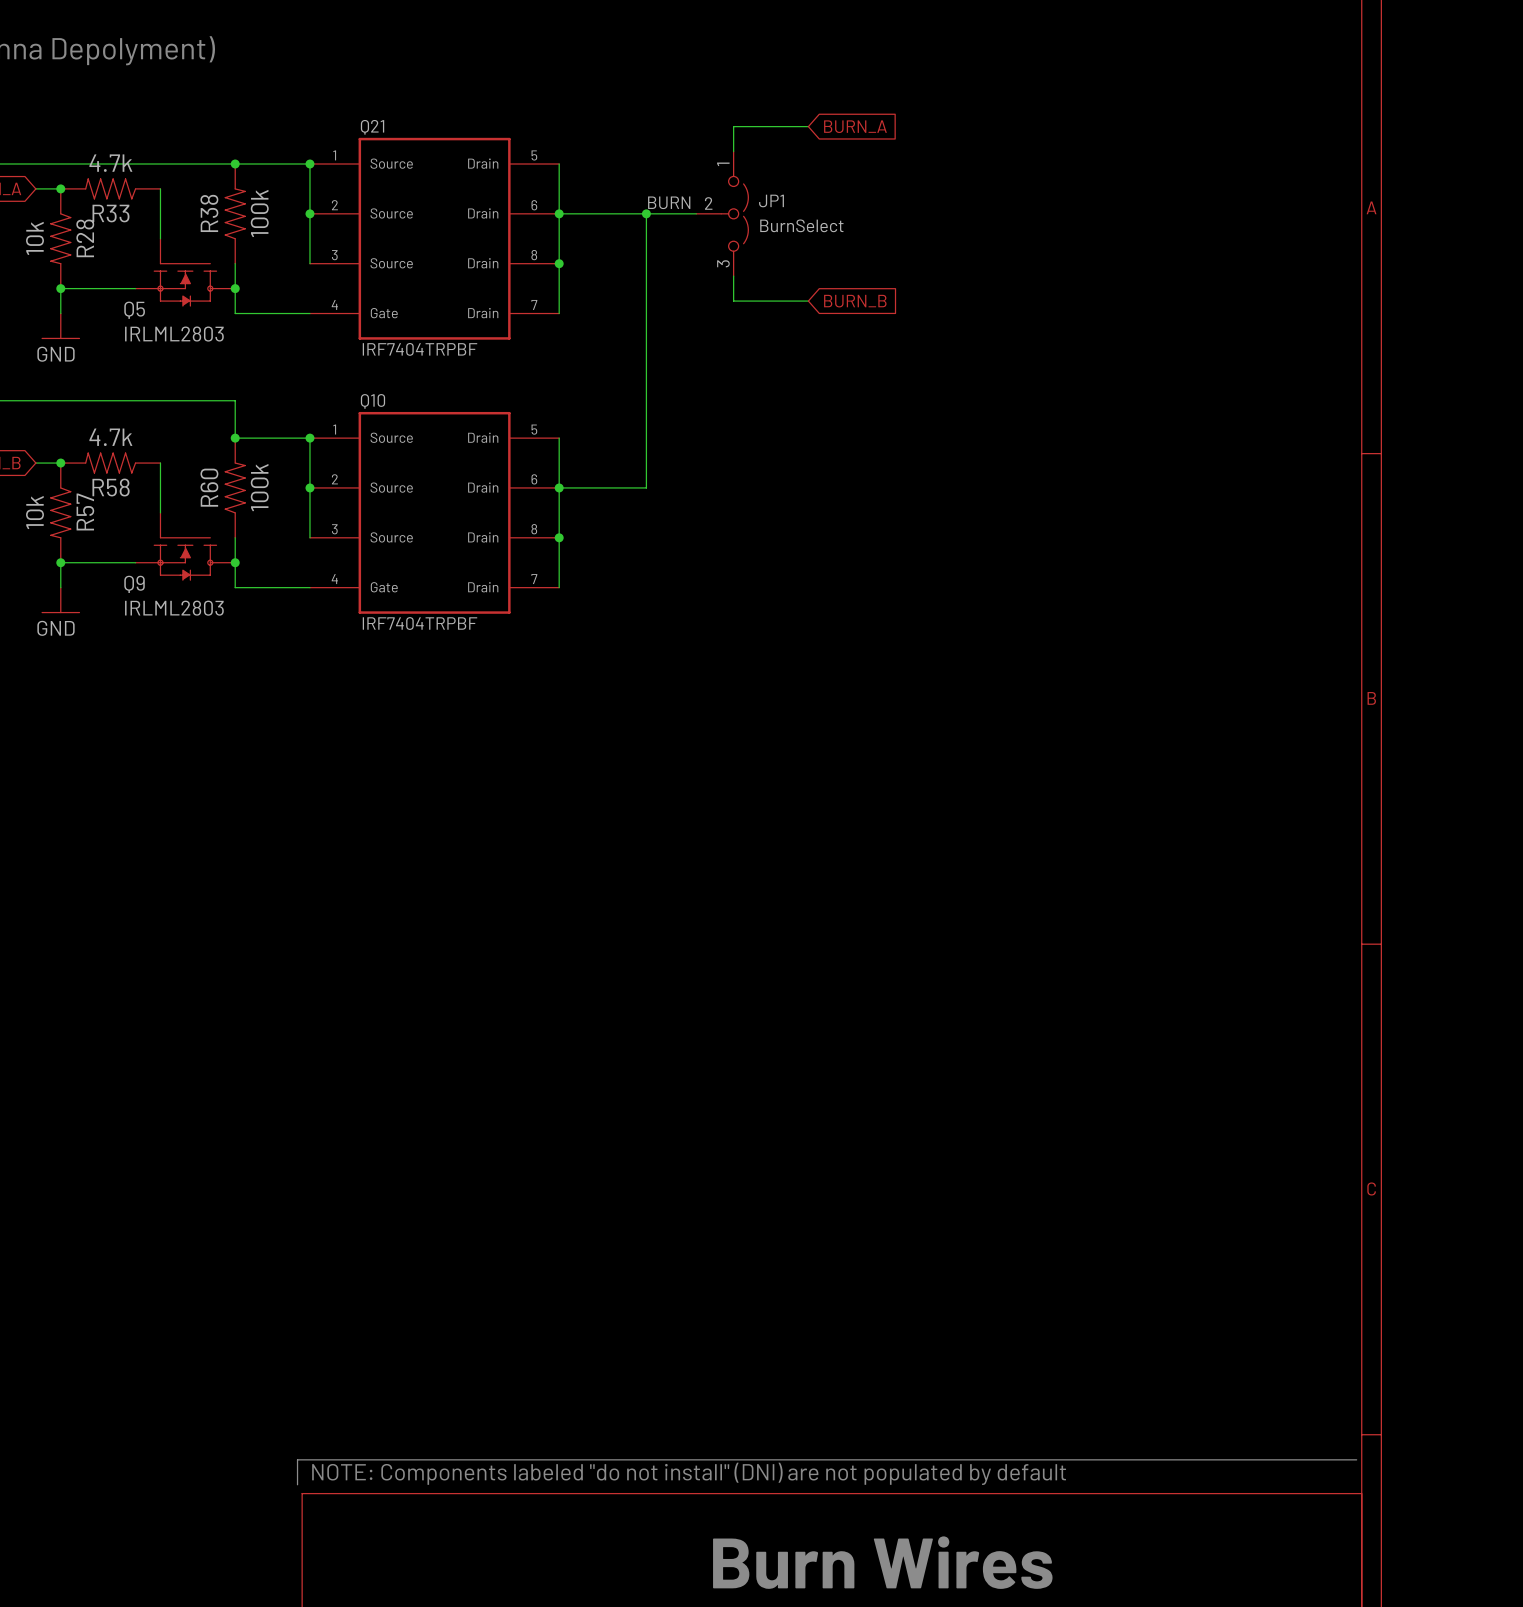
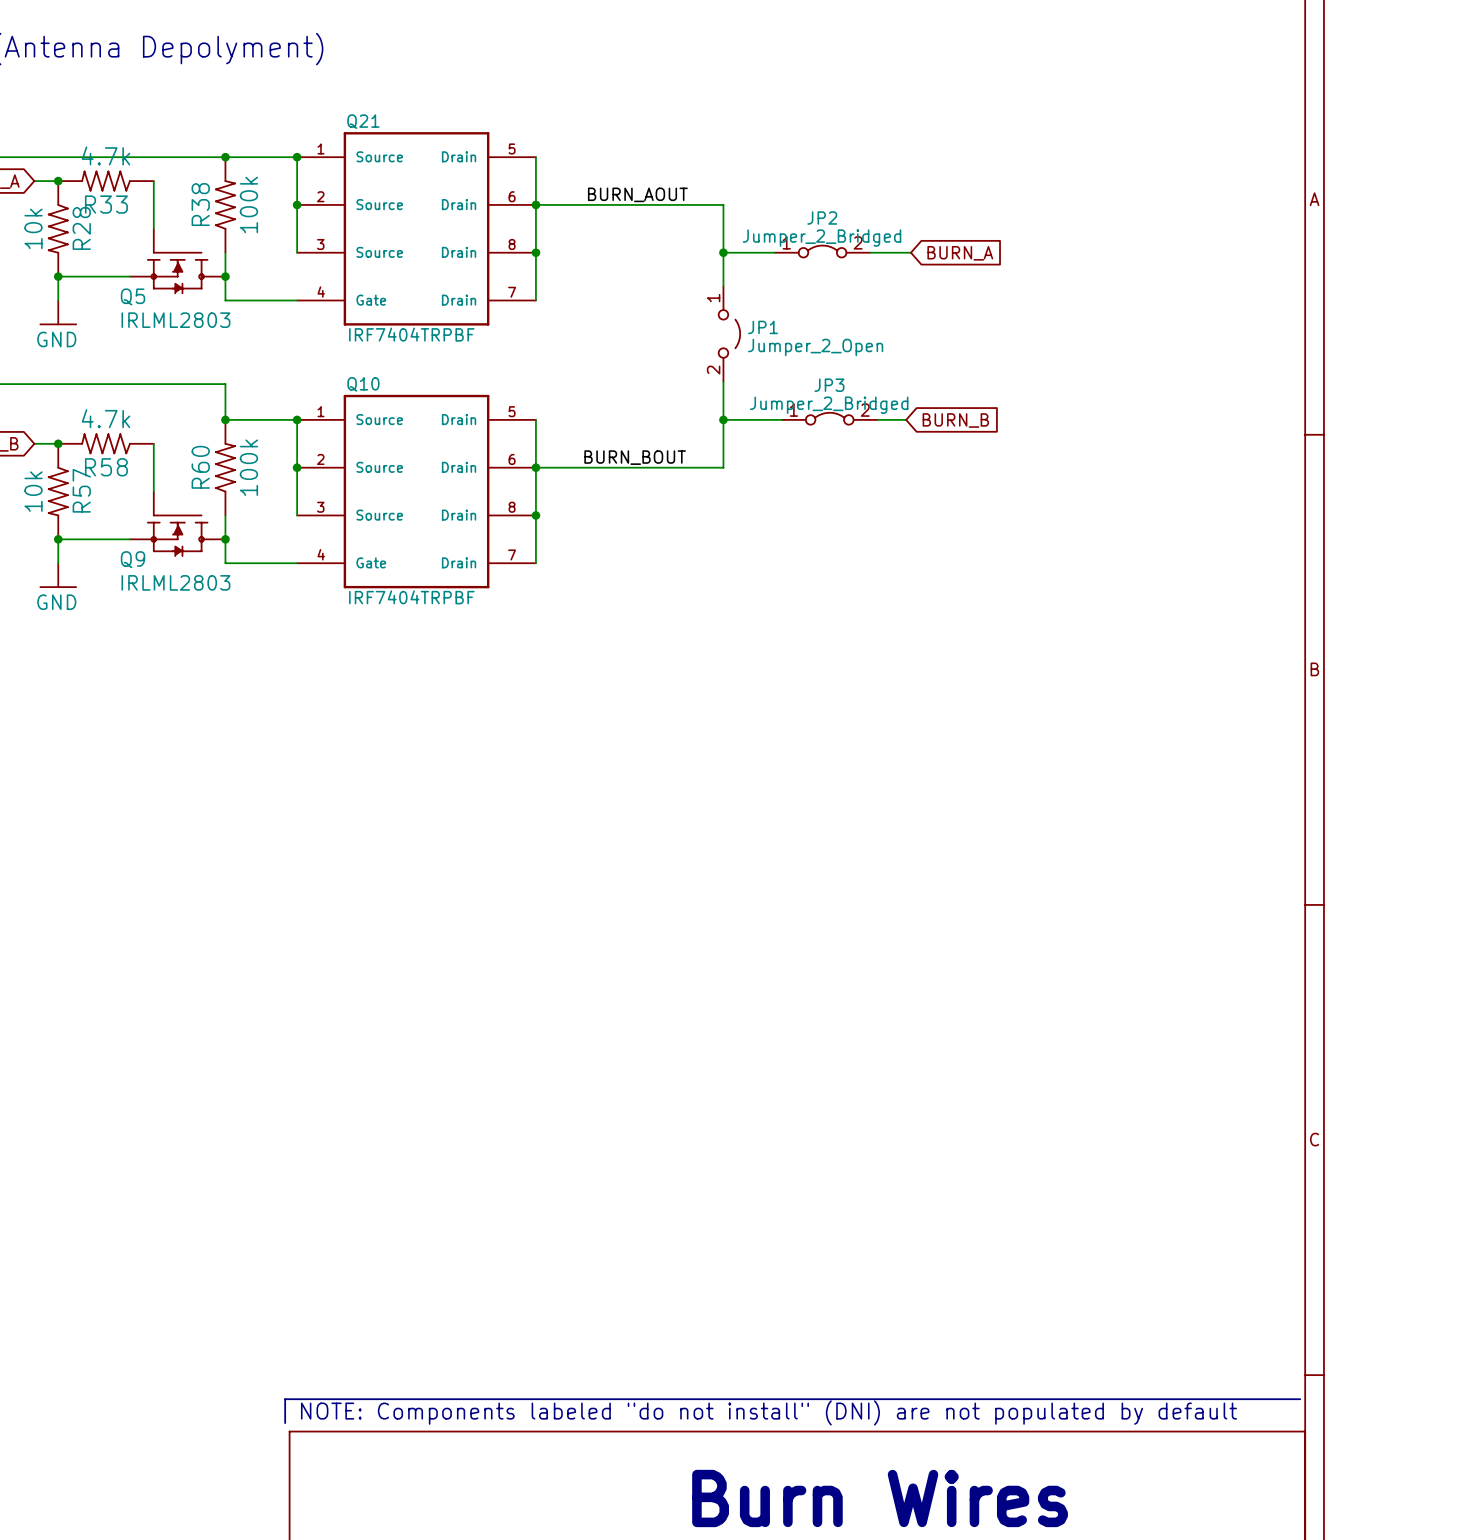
wire: (808, 126) (733, 126) (733, 151) -> none
global label position: BURN_A (855, 126) -> BURN_A (960, 253)
JP1 symbol: [696, 151, 749, 277] -> [718, 286, 741, 382]
JP1 name position: JP1 (771, 200) -> JP1 (763, 327)
label: BURN (669, 202) -> BURN_AOUT (637, 194)
wire: (646, 213) (646, 487) -> (723, 381) (723, 467) (619, 467)
junction: (646, 213) -> none
wire: none -> (667, 204) (723, 204) (723, 286)
JP1 value: BurnSelect (801, 225) -> Jumper_2_Open (815, 347)
JP2: none -> Jumper_2_Bridged (822, 251)
wire: none -> (723, 252) (774, 252)
junction: none -> (723, 252)
wire: none -> (870, 252) (910, 252)
wire: (733, 276) (733, 301) (808, 301) -> none
global label position: BURN_B (855, 301) -> BURN_B (955, 420)
JP3: none -> Jumper_2_Bridged (829, 418)
wire: none -> (723, 419) (781, 419)
junction: none -> (723, 419)
wire: none -> (877, 419) (906, 419)
label: none -> BURN_BOUT (635, 457)

